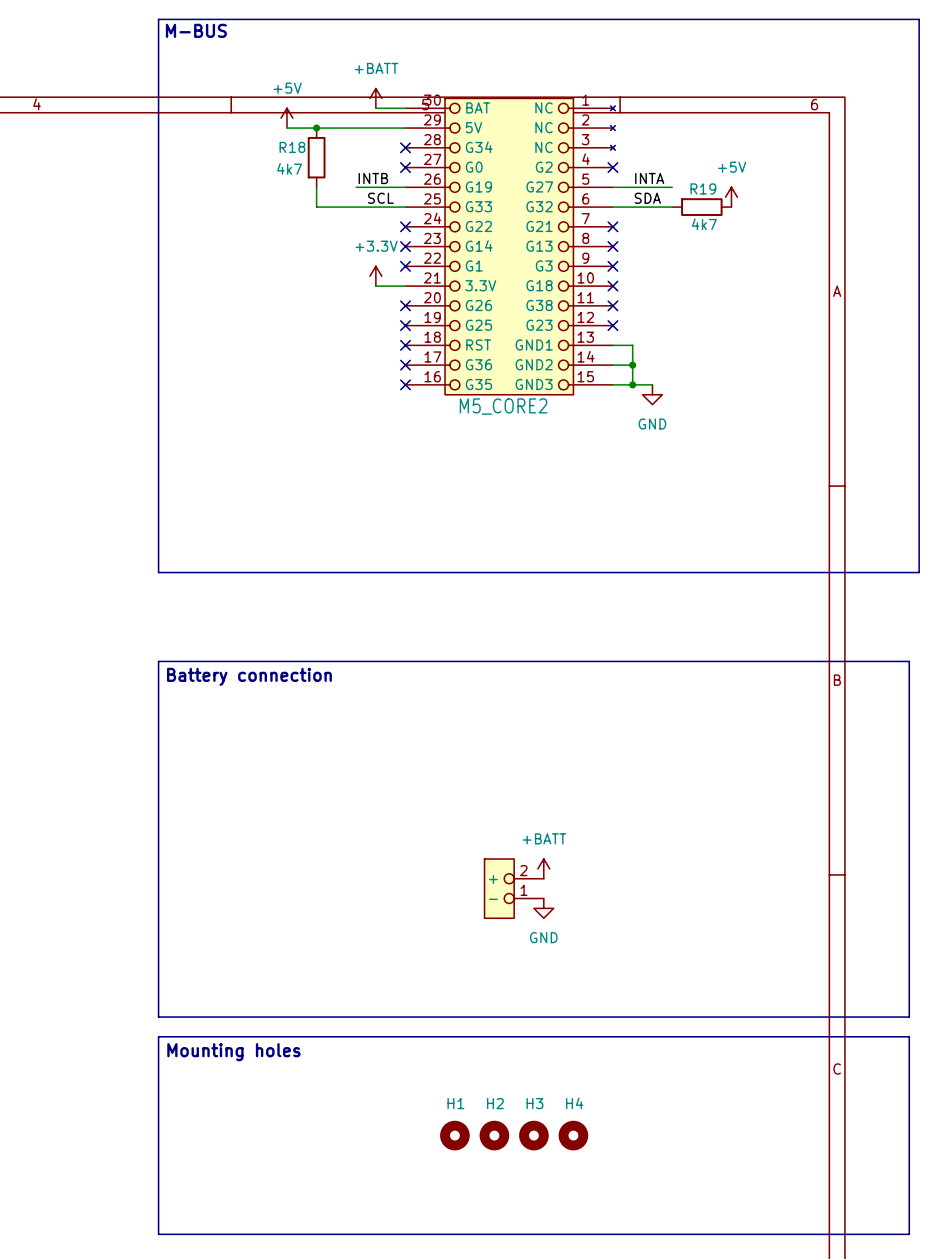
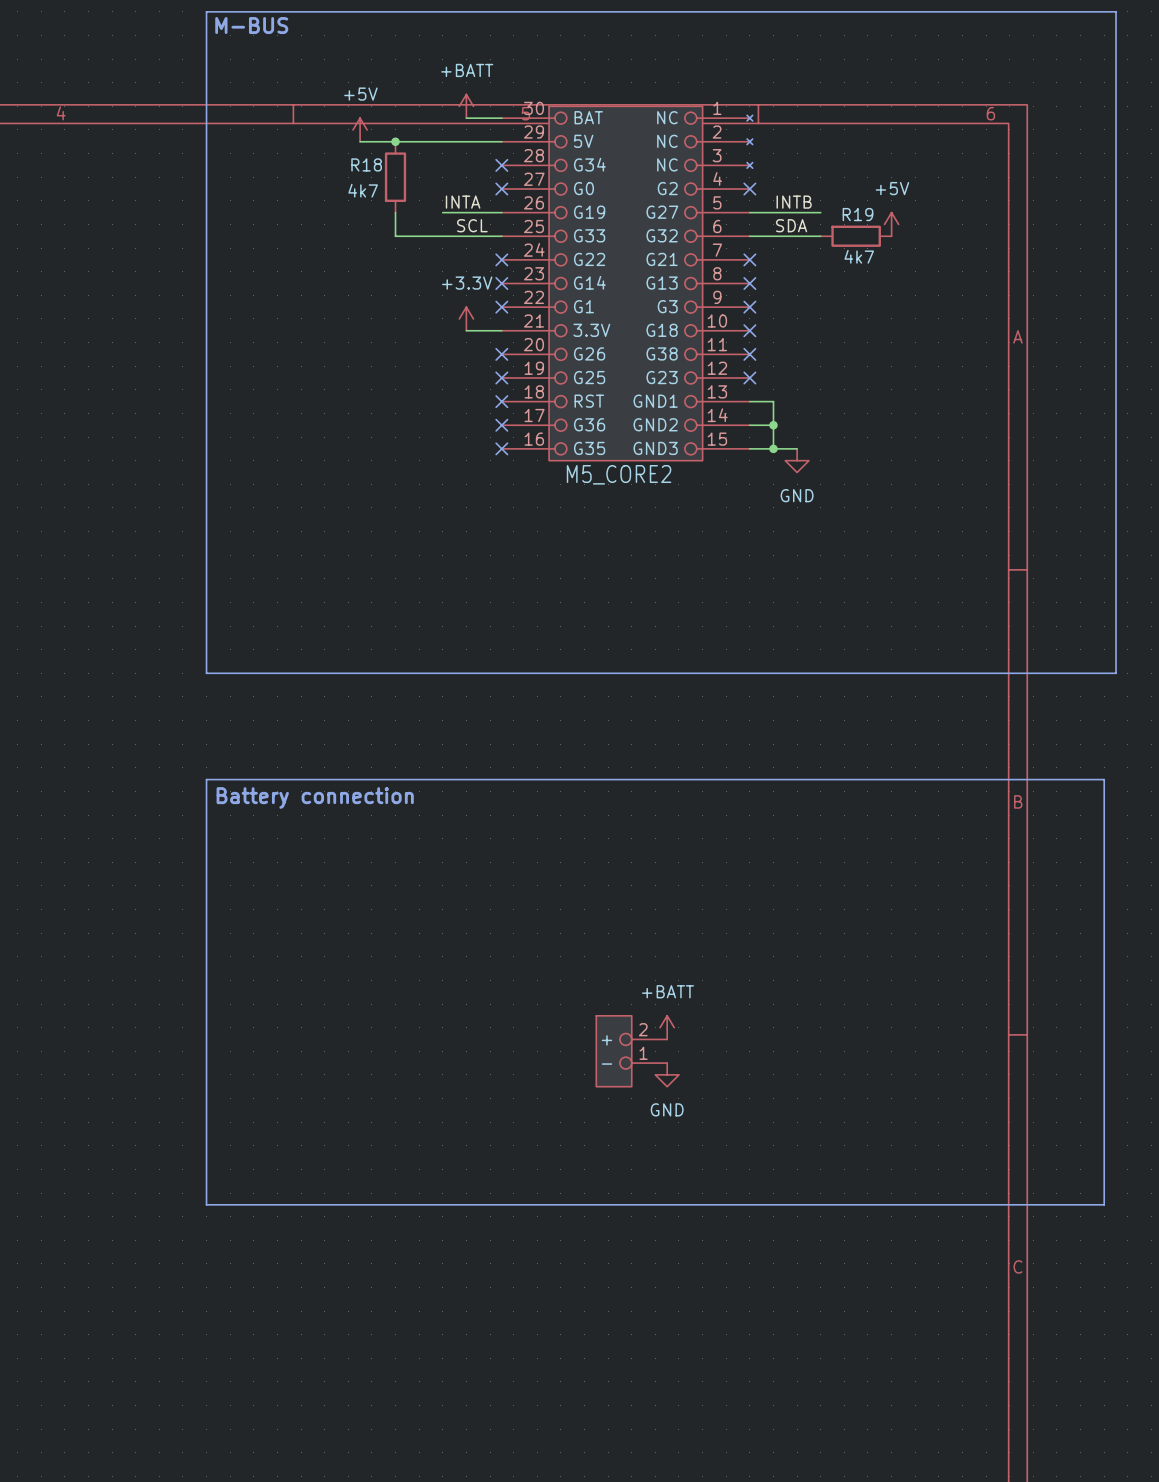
label: INTB (373, 178) -> INTA (463, 202)
label: INTA (649, 178) -> INTB (794, 202)
line: (158, 1036) (909, 1036) (909, 1234) (158, 1234) (158, 1036) -> none
text: Mounting holes (233, 1052) -> none
H1: (454, 1135) -> none
H2: (494, 1135) -> none
H3: (533, 1135) -> none
H4: (573, 1135) -> none

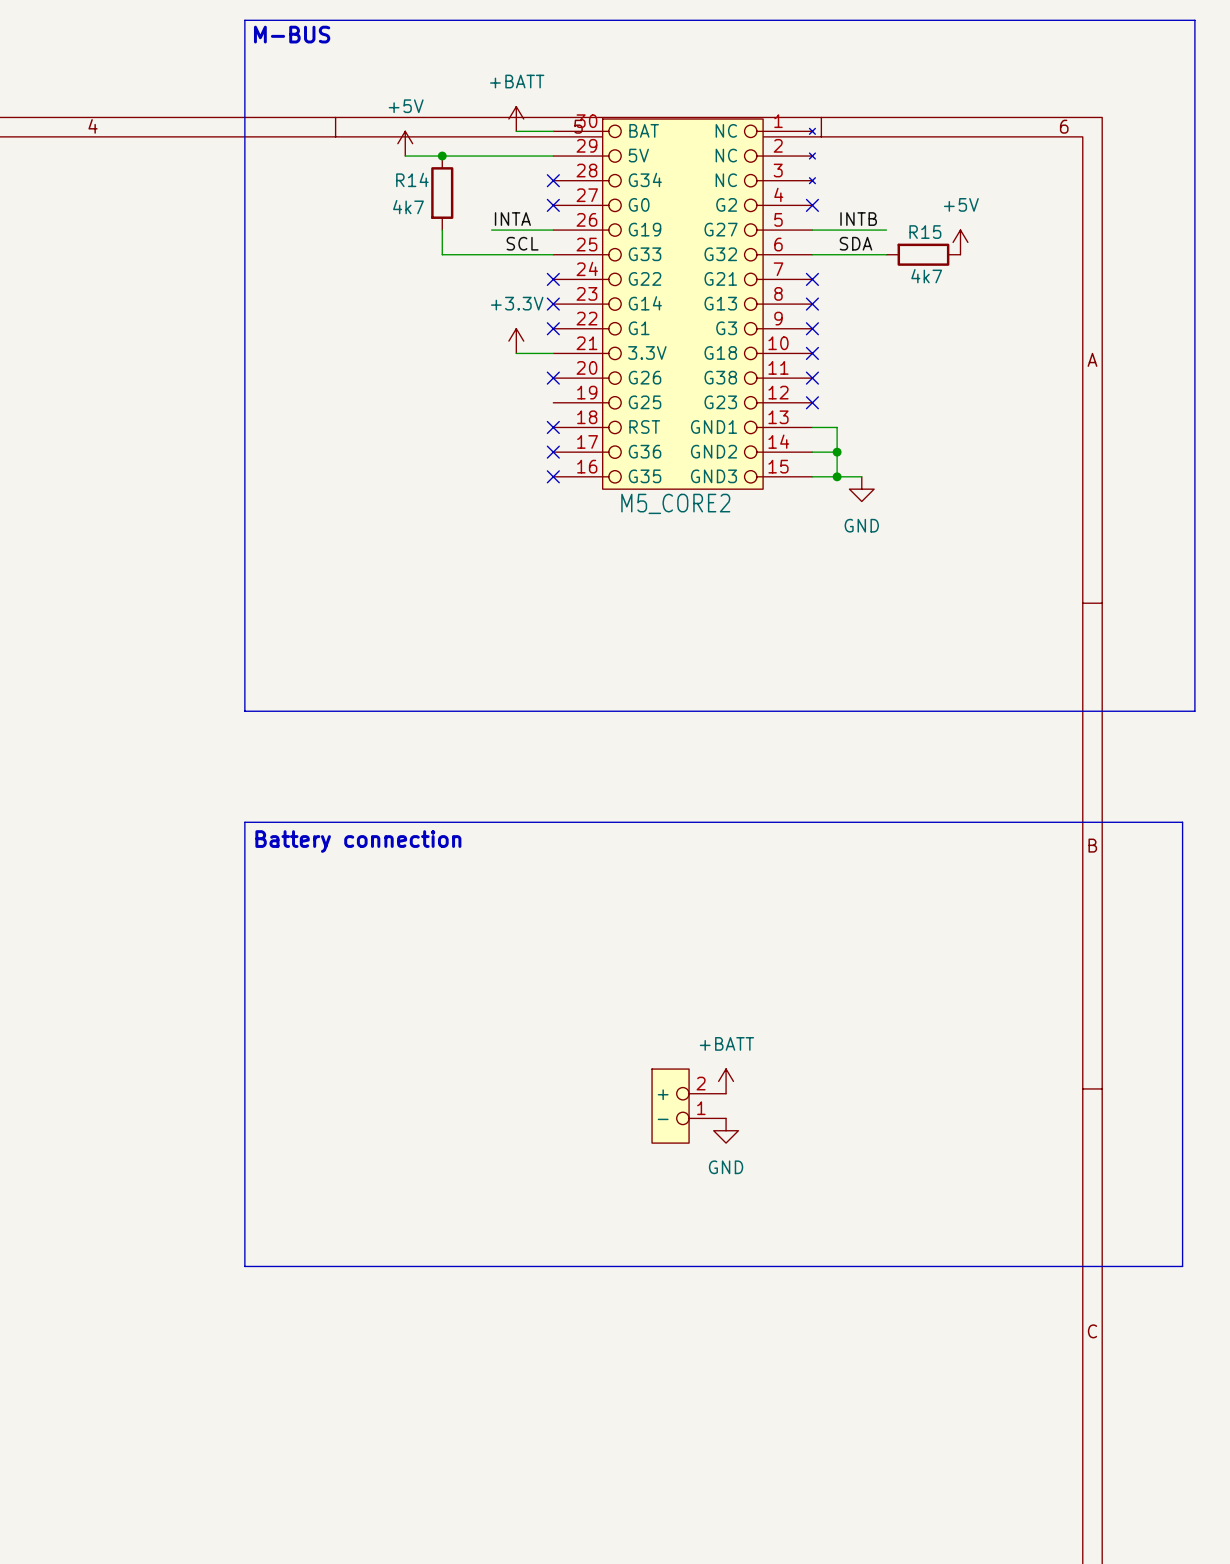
R18 name: R18 (366, 164) -> R14 (412, 179)
R19 name: R19 (857, 214) -> R15 (925, 232)
no-connect mark: (501, 378) -> none

